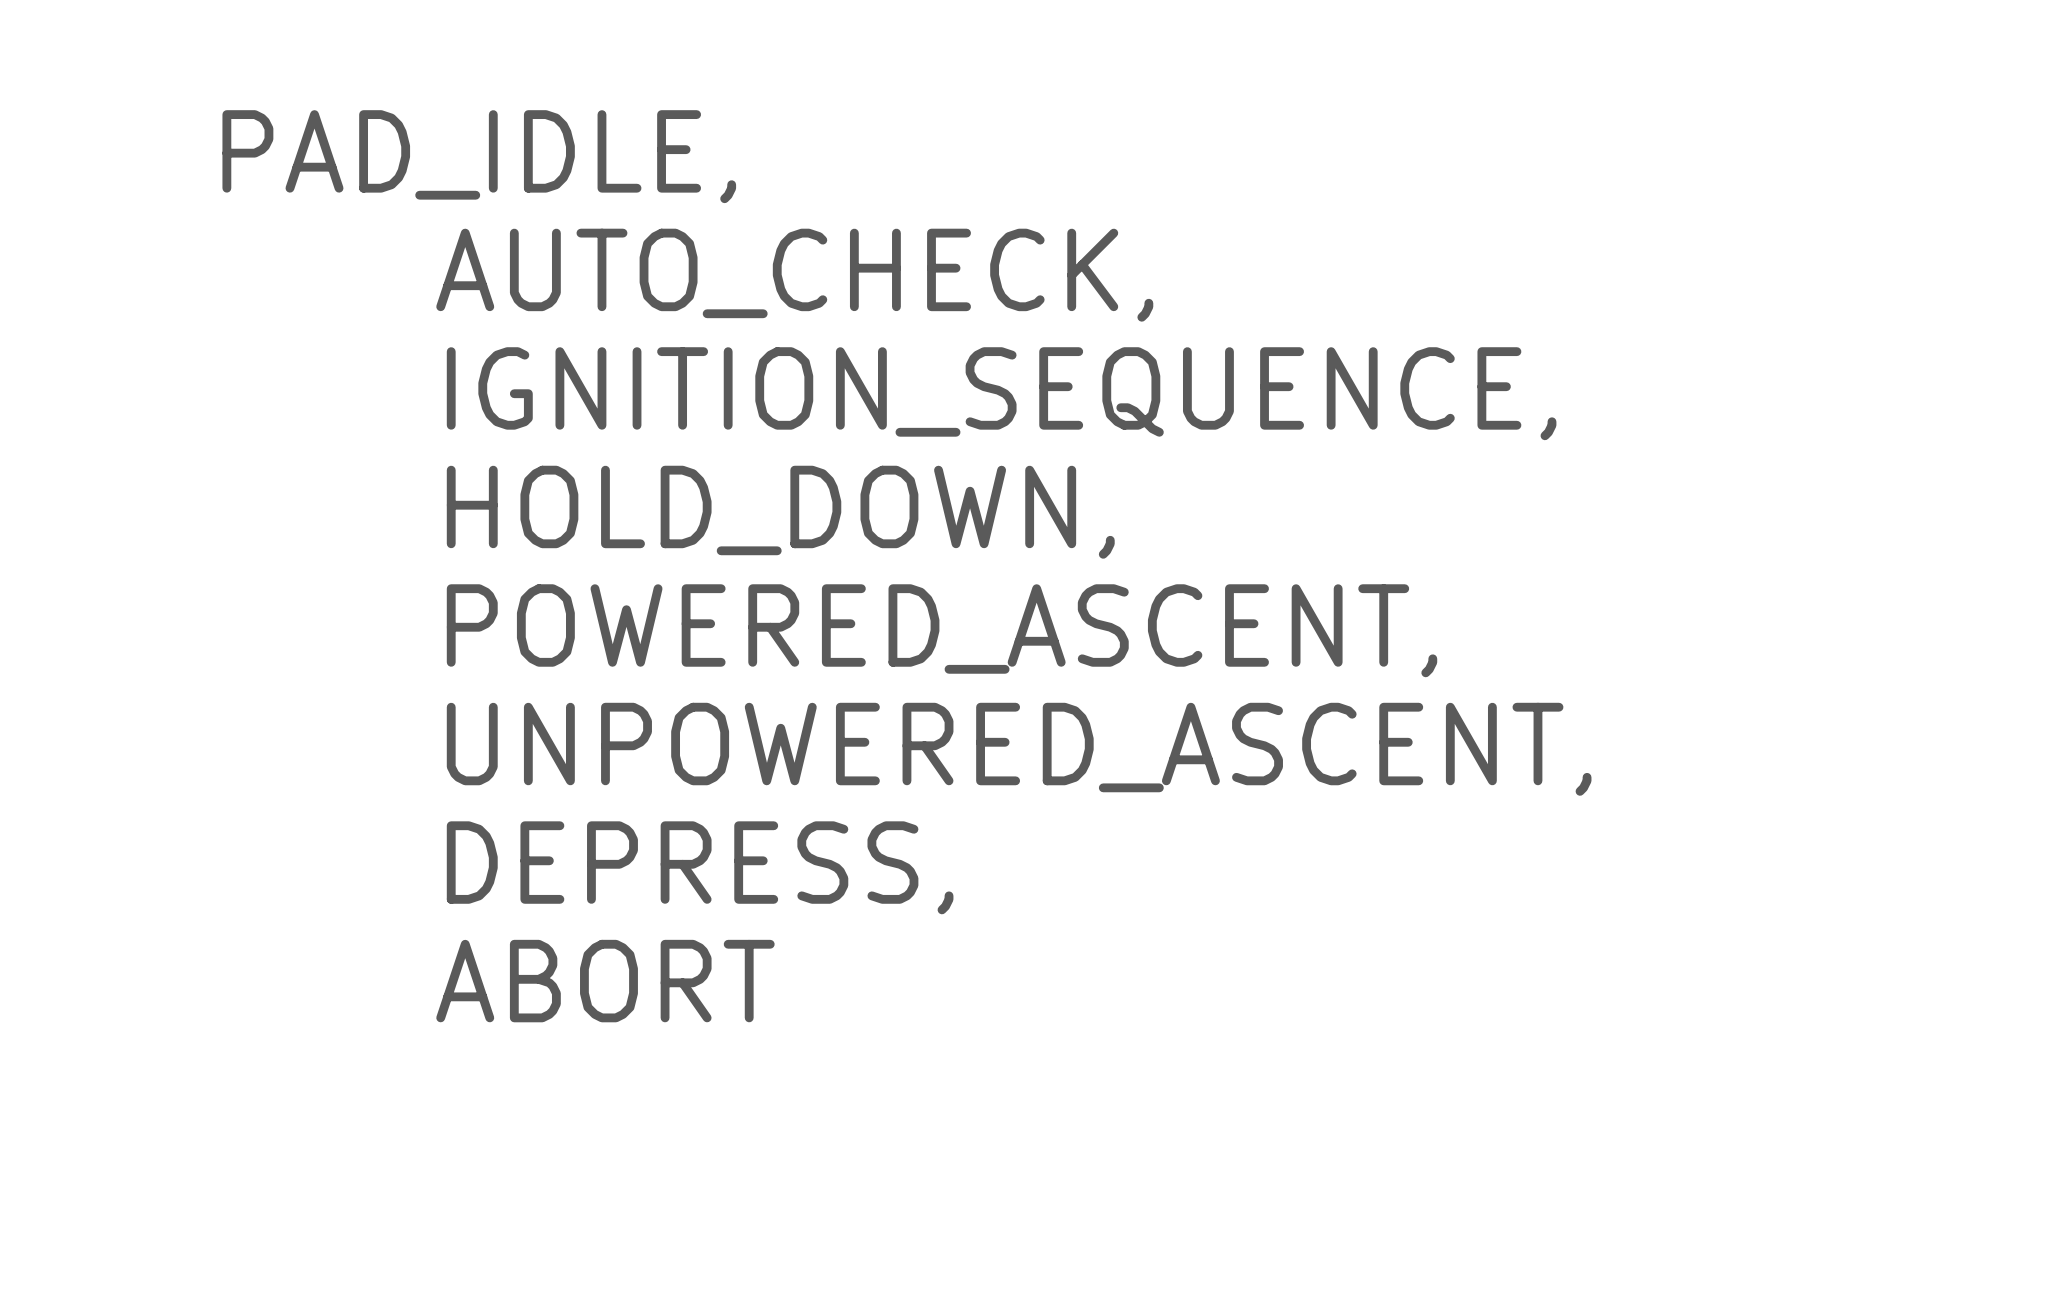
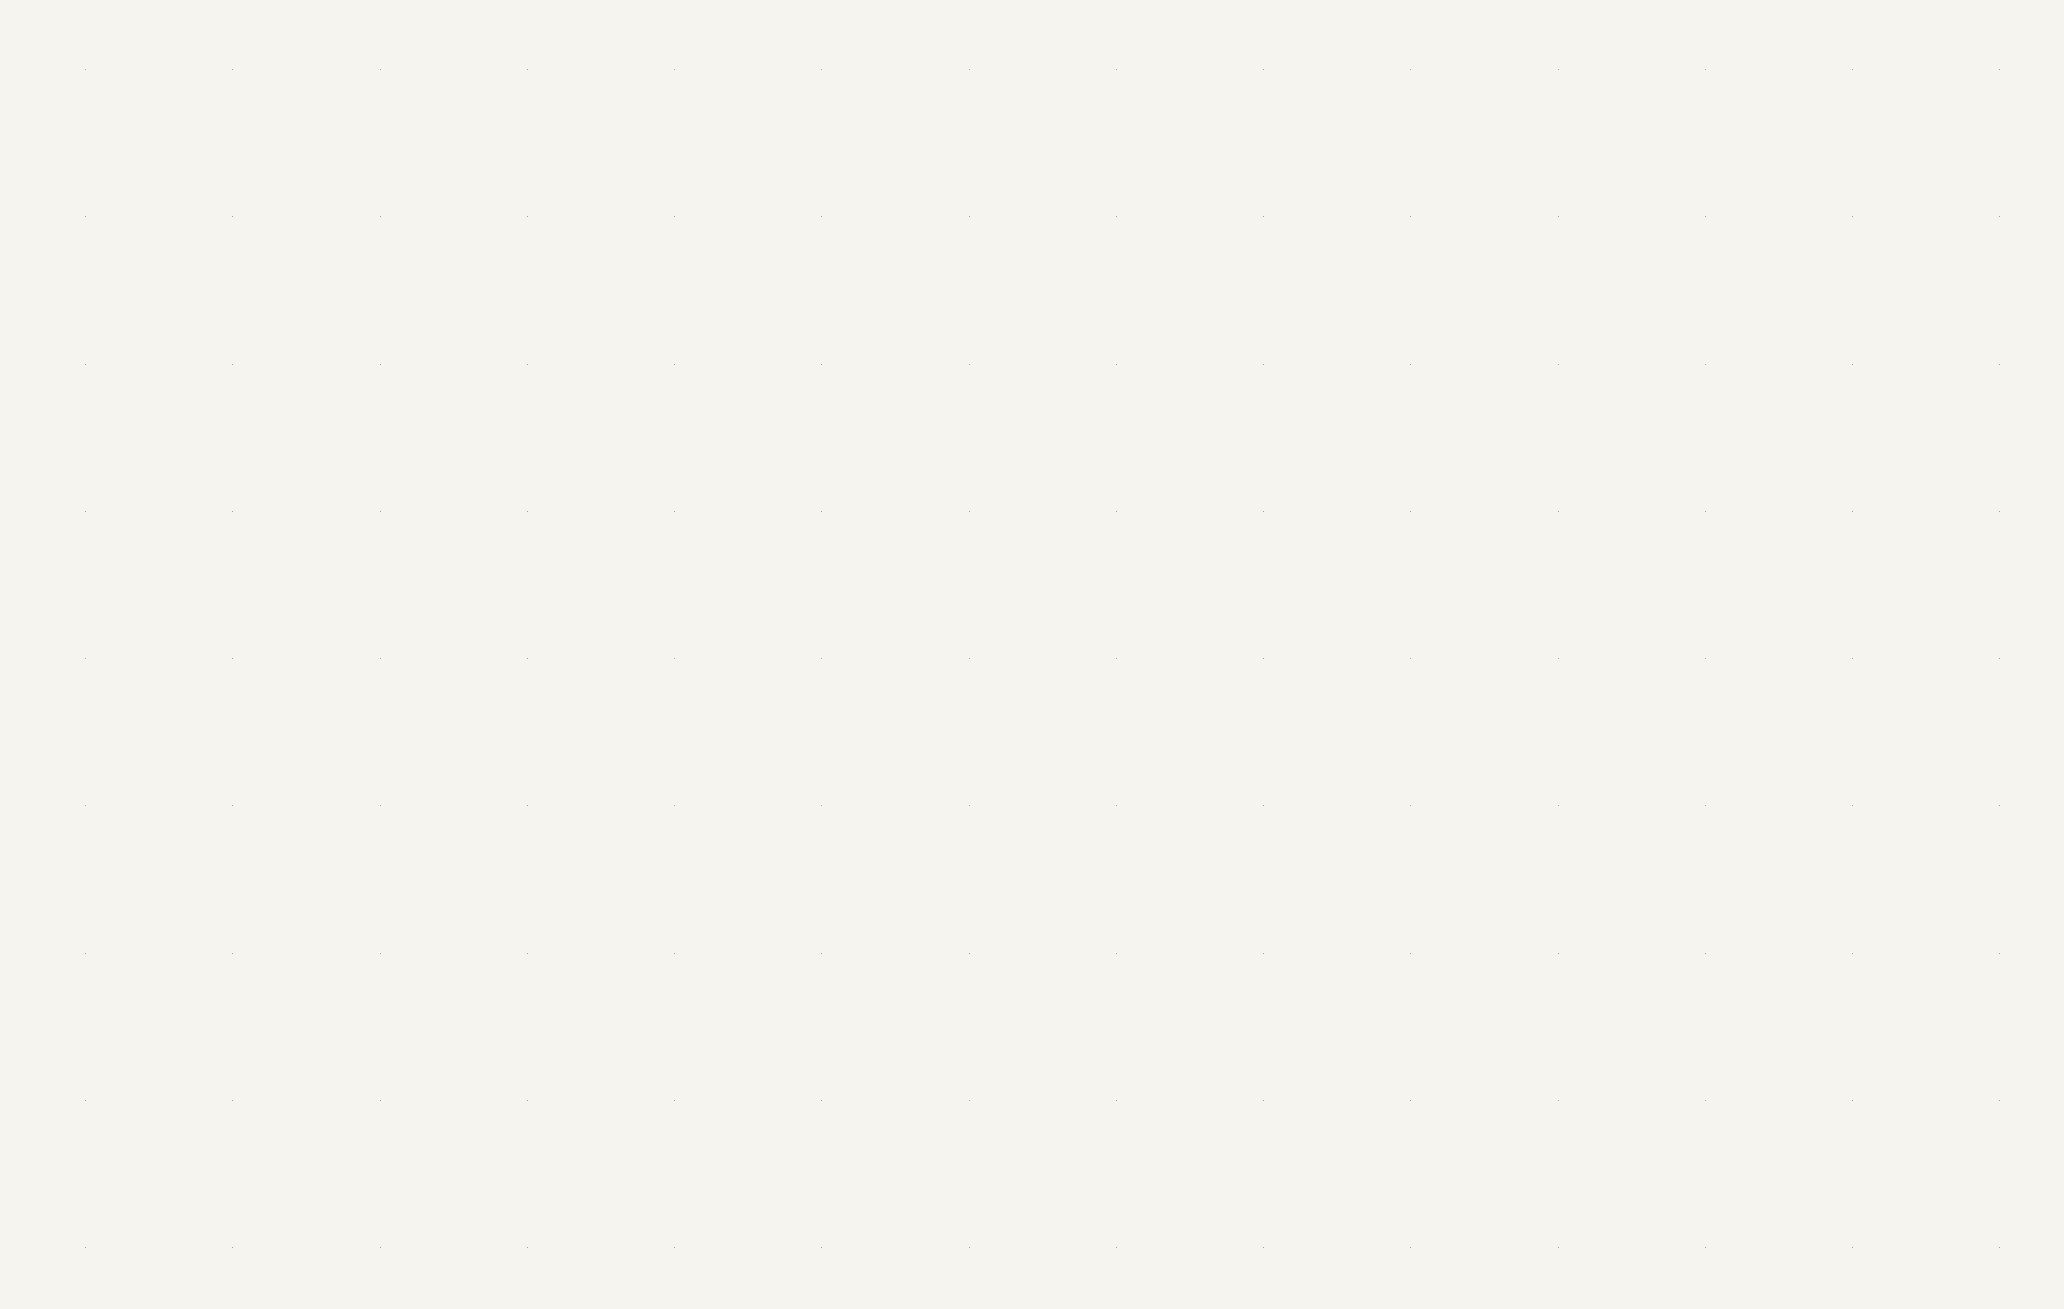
text: PAD_IDLE, (479, 156) -> none
text: AUTO_CHECK, (794, 275) -> none
text: IGNITION_SEQUENCE, (1001, 393) -> none
text: HOLD_DOWN, (780, 512) -> none
text: POWERED_ASCENT, (942, 630) -> none
text: UNPOWERED_ASCENT, (1019, 749) -> none
text: DEPRESS, (700, 867) -> none
text: ABORT (605, 981) -> none

